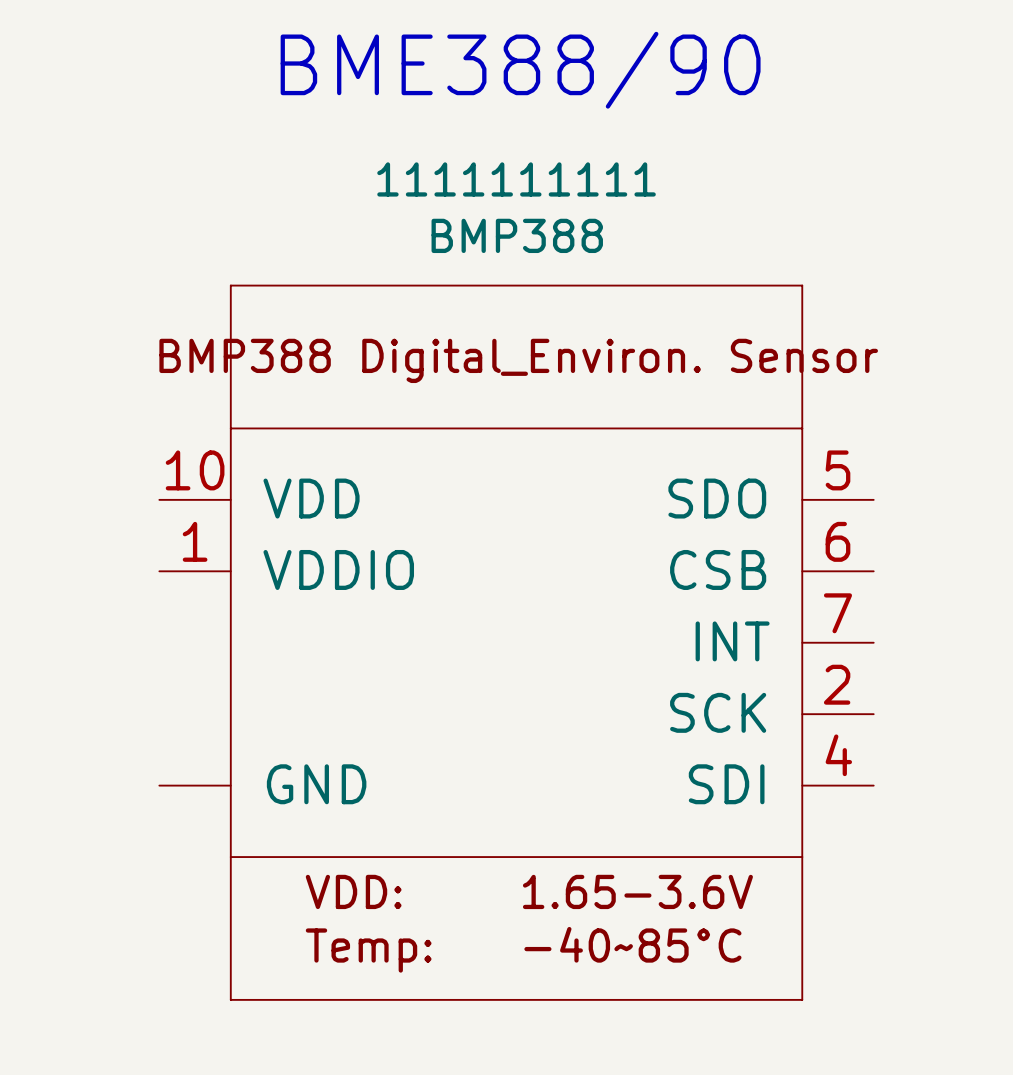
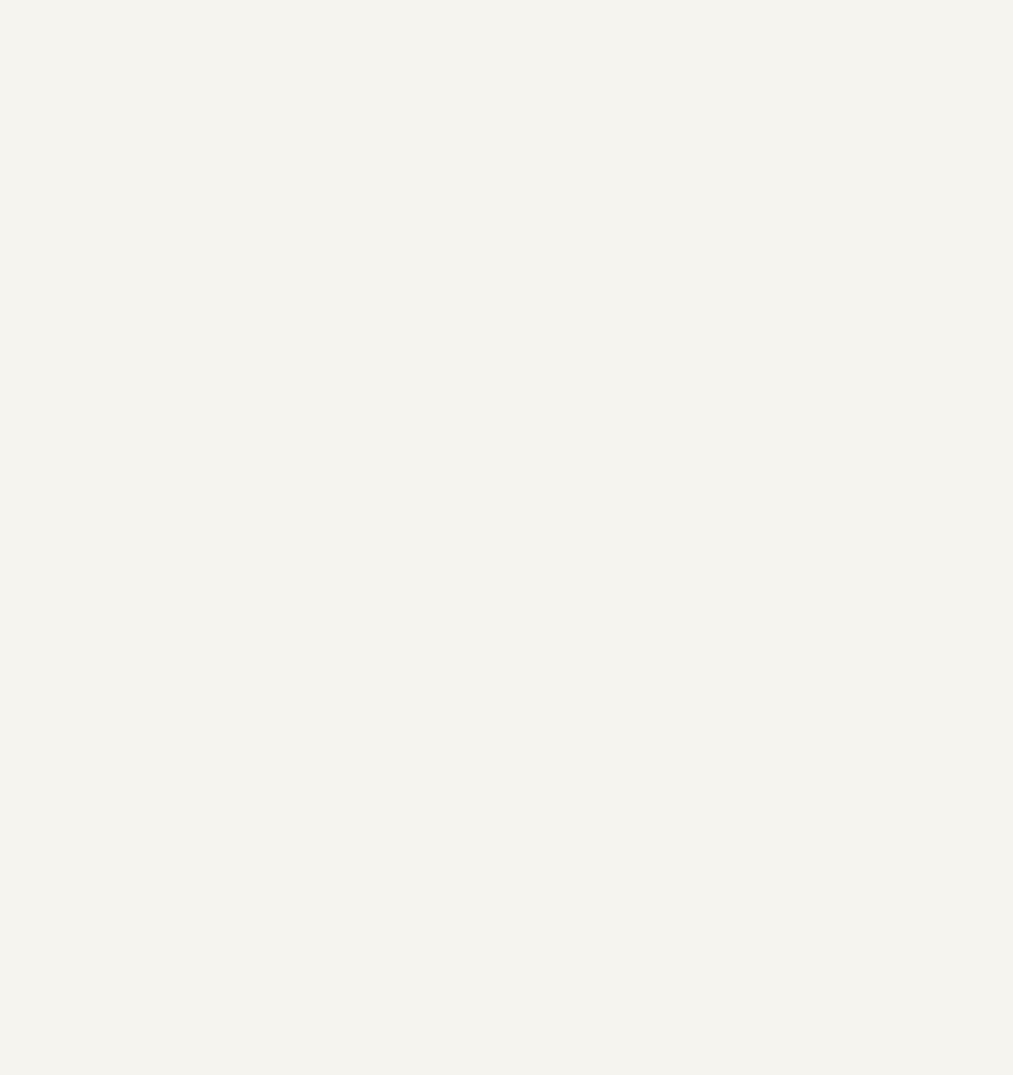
text: BME388/90 (520, 70) -> none
1111111111: BMP388 (516, 642) -> none

